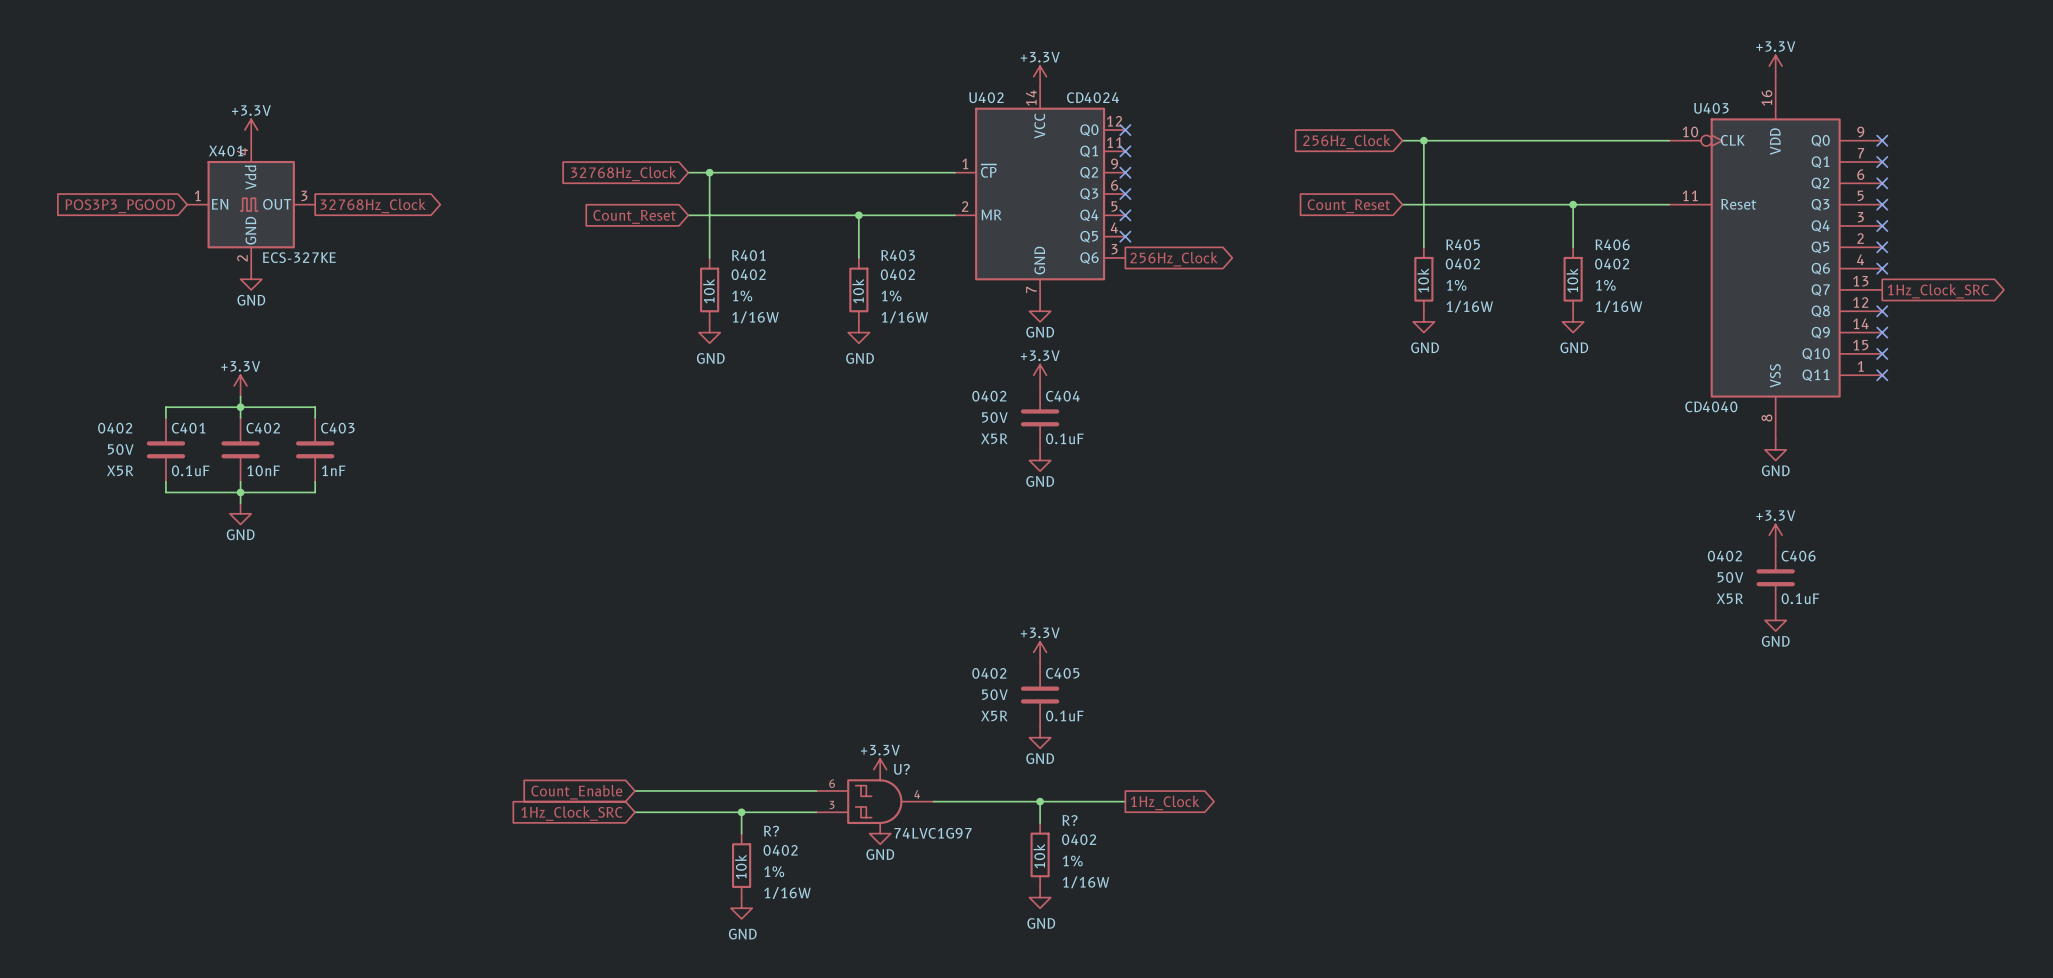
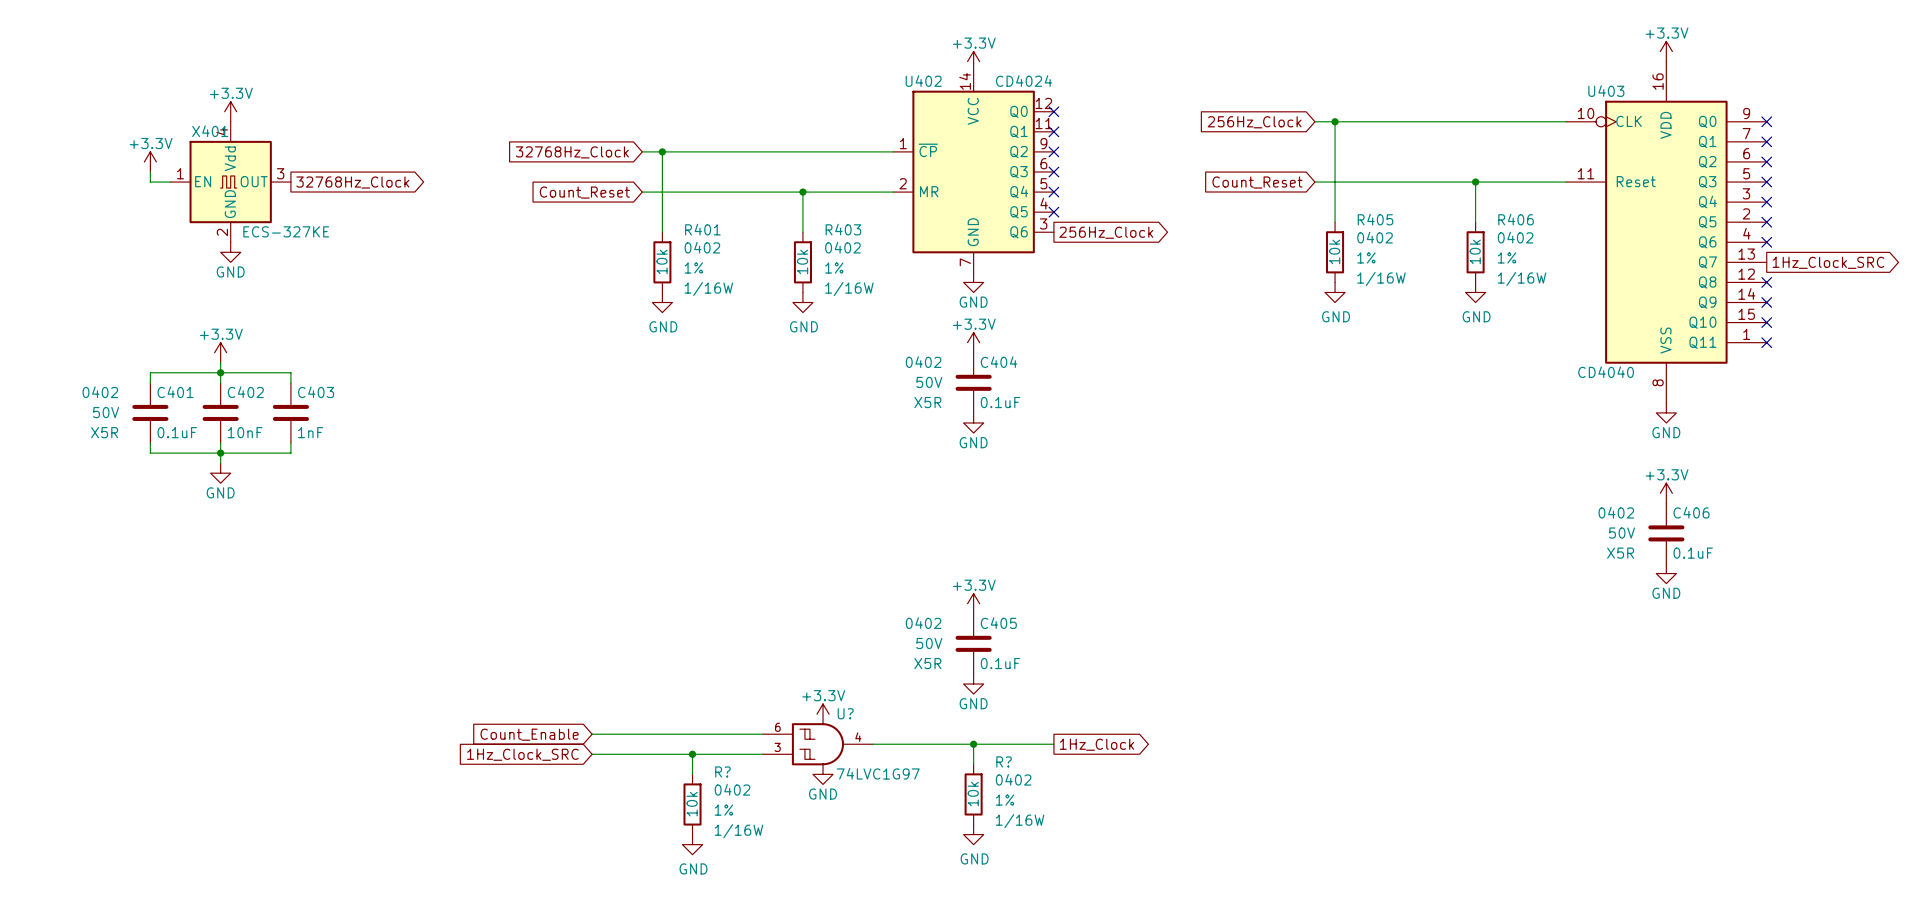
power symbol: none -> +3.3V (150, 161)
wire: none -> (150, 171) (150, 182) (170, 182)
global label: POS3P3_PGOOD (120, 206) -> none

